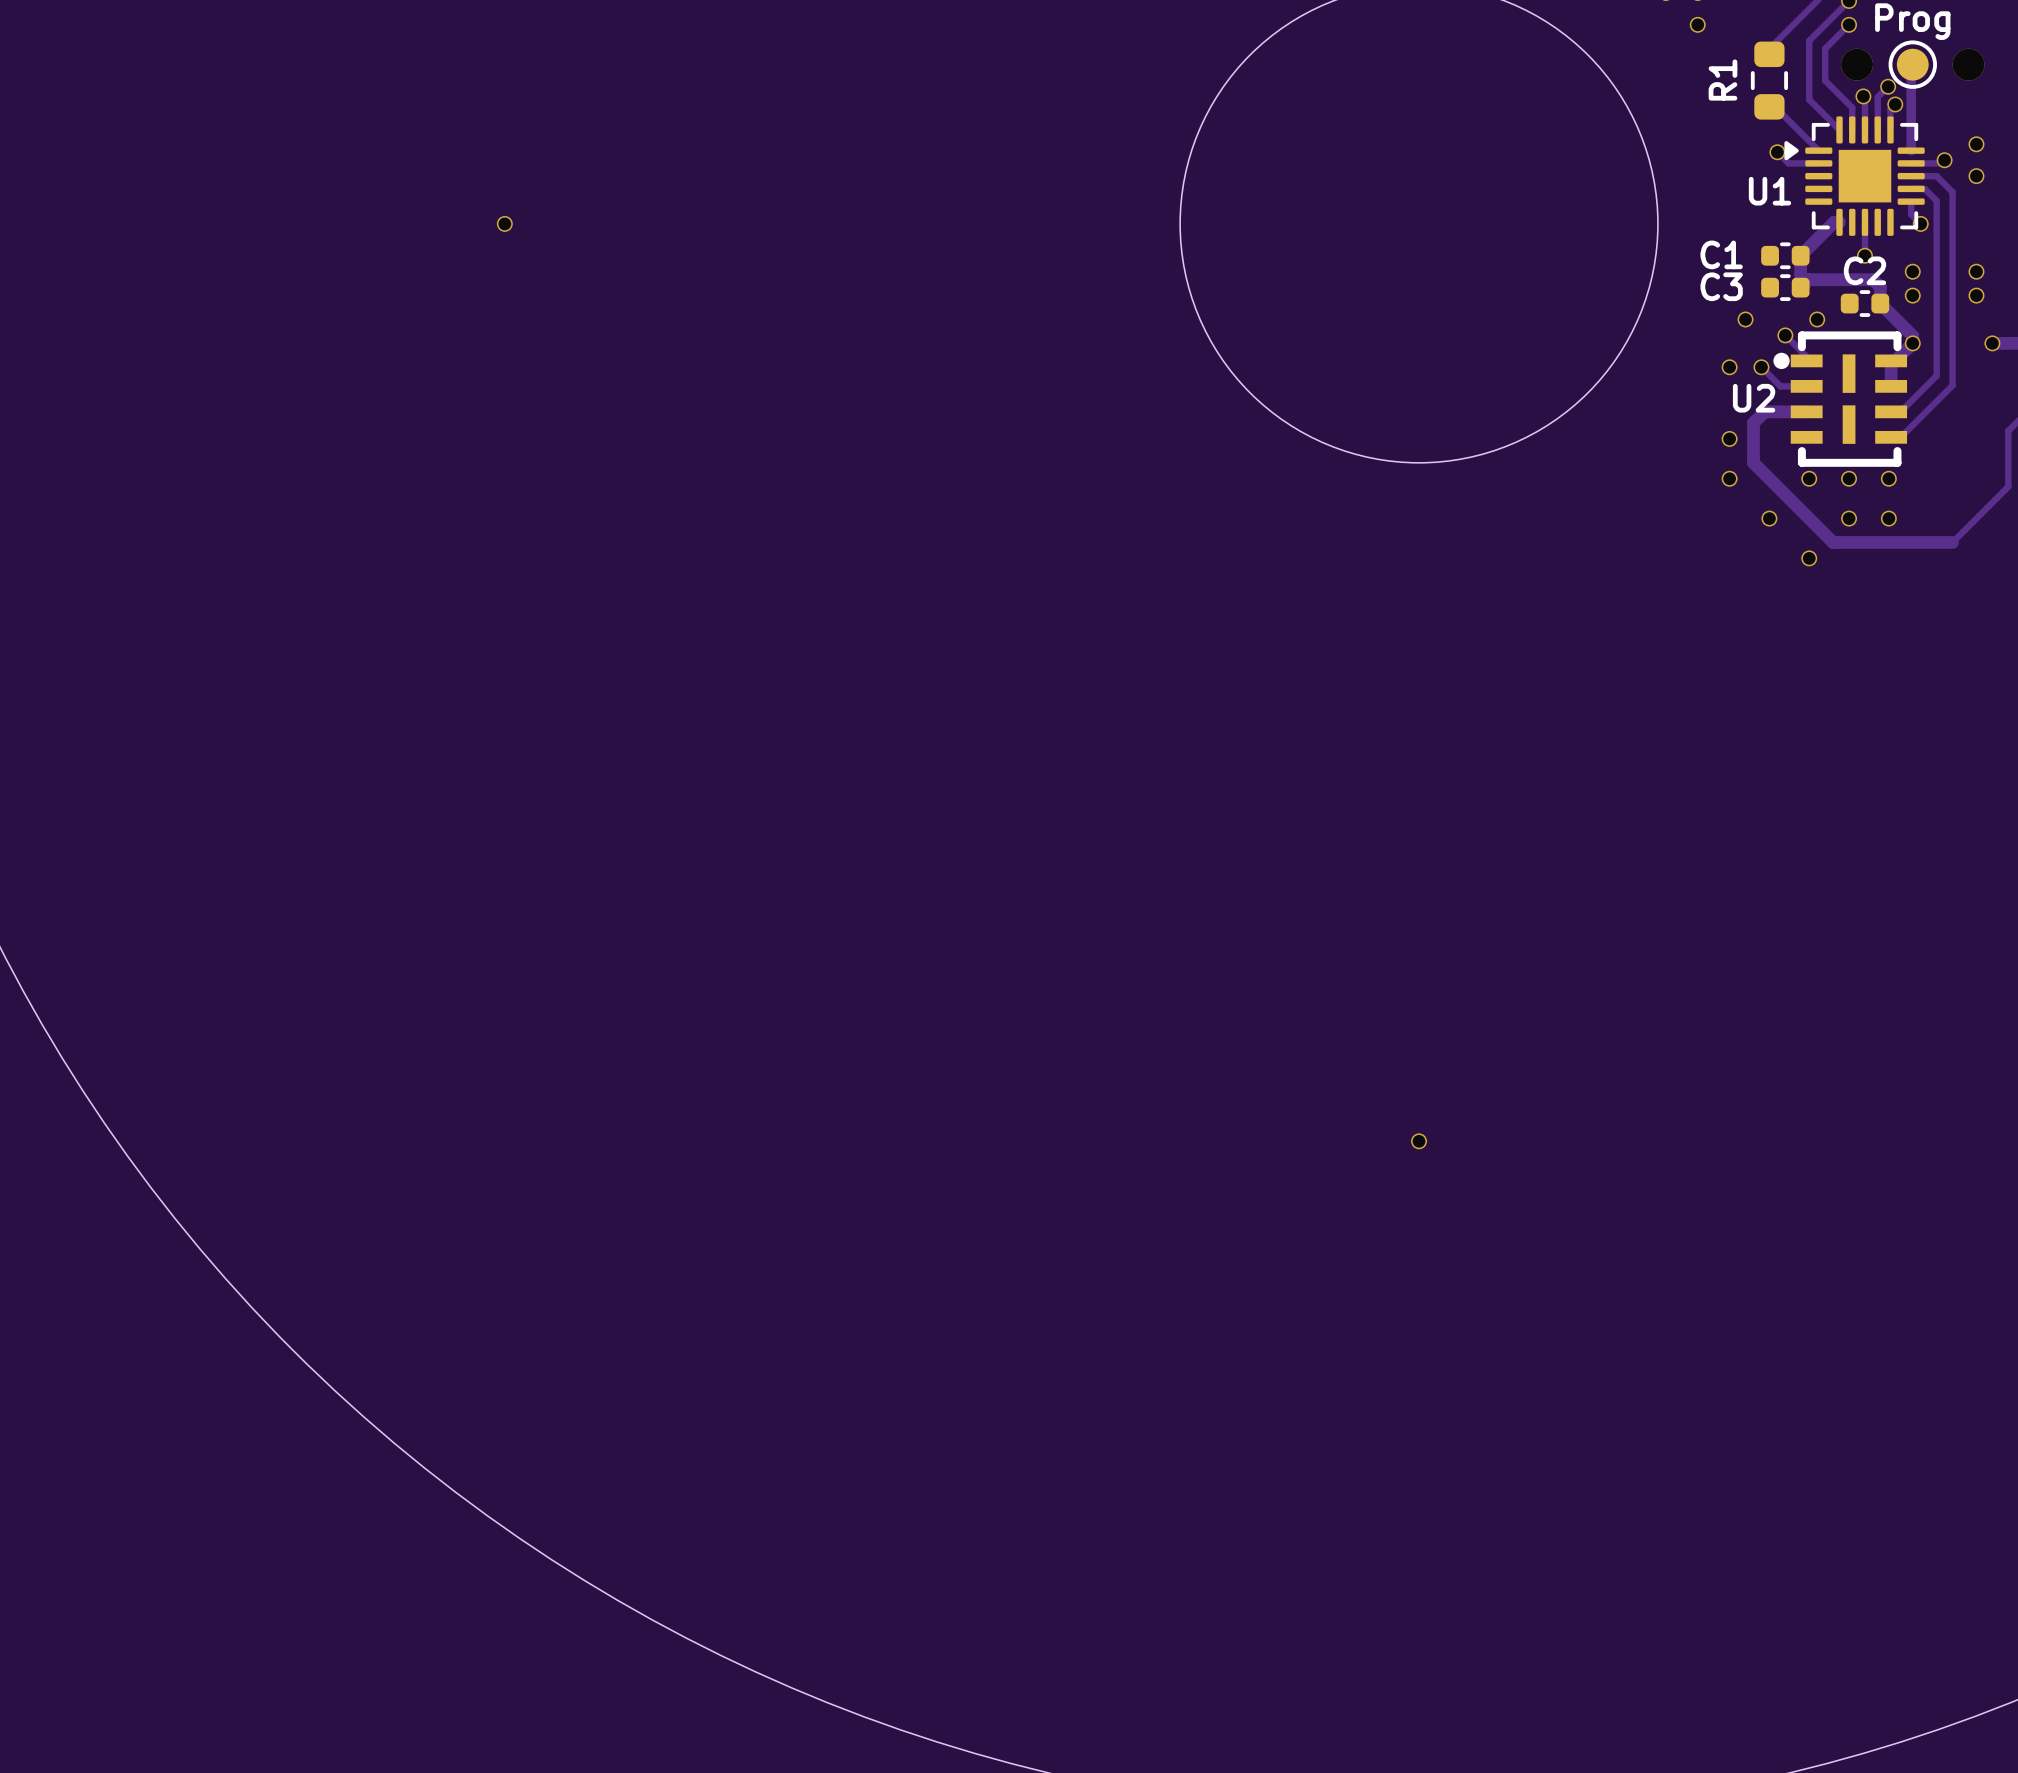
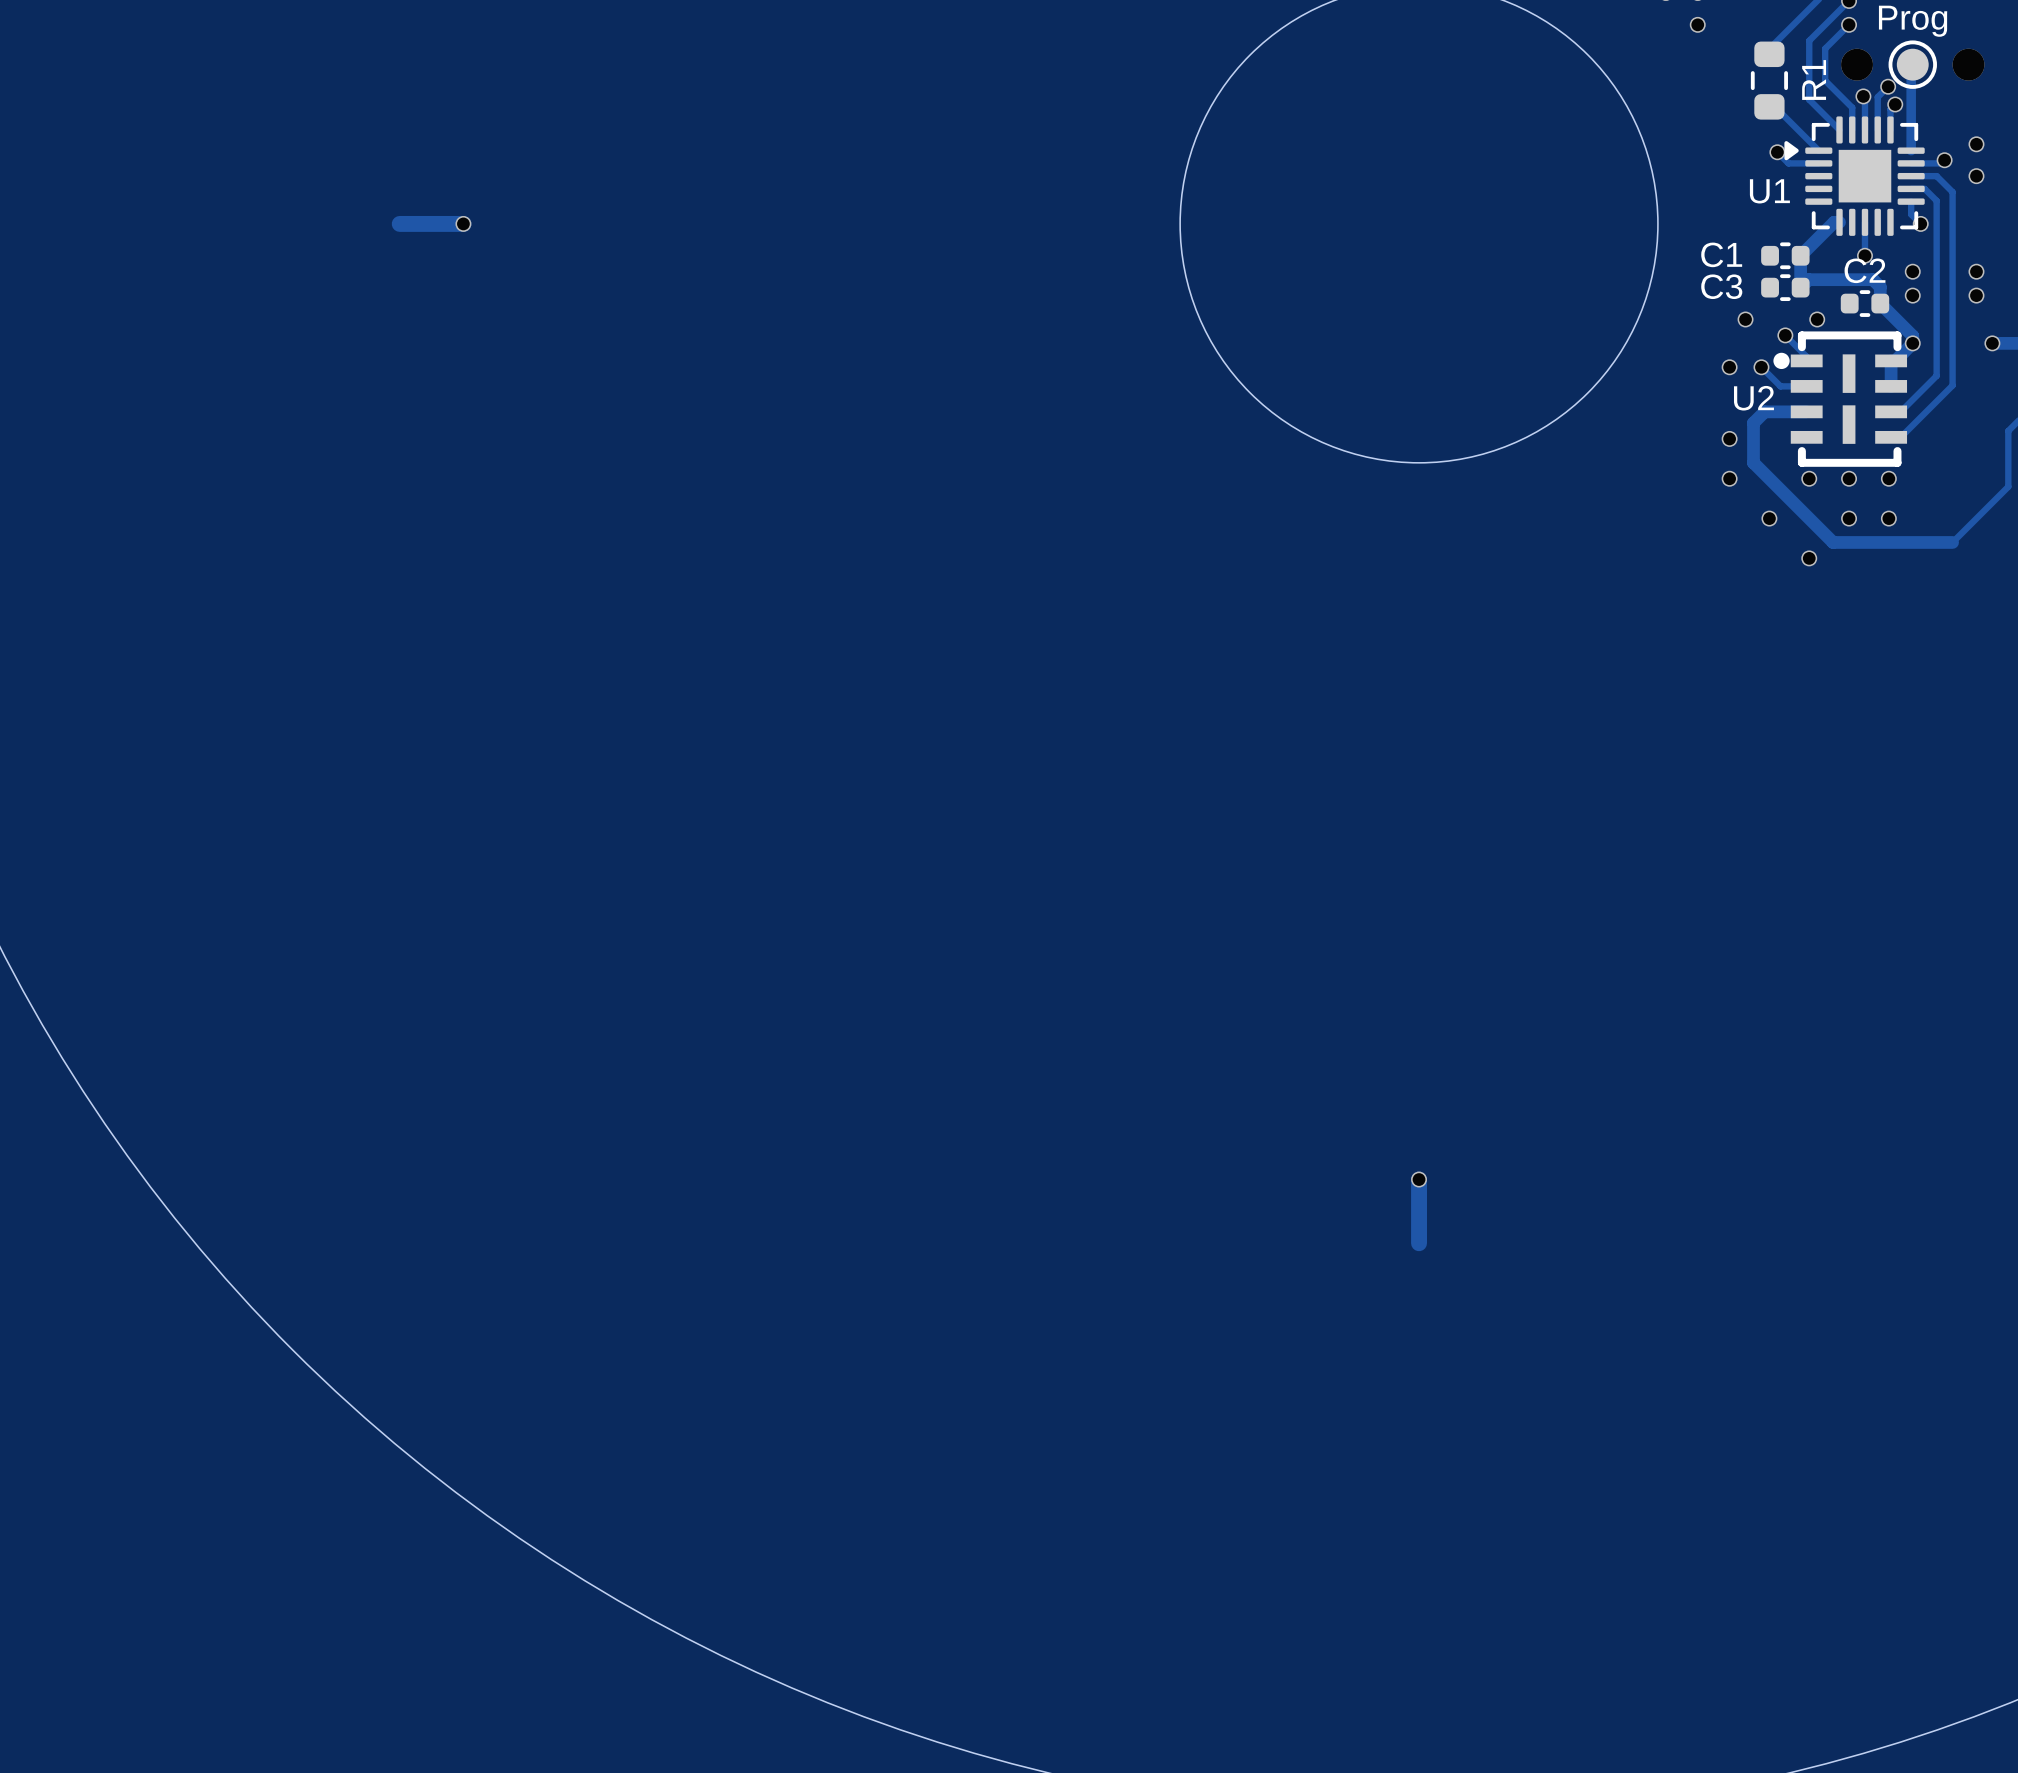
R1 name position: R1 (1722, 80) -> R1 (1814, 80)
track: none -> (399, 223) (463, 223)
via position: (504, 223) -> (463, 223)
via position: (1419, 1141) -> (1419, 1179)
track: none -> (1419, 1179) (1419, 1243)

